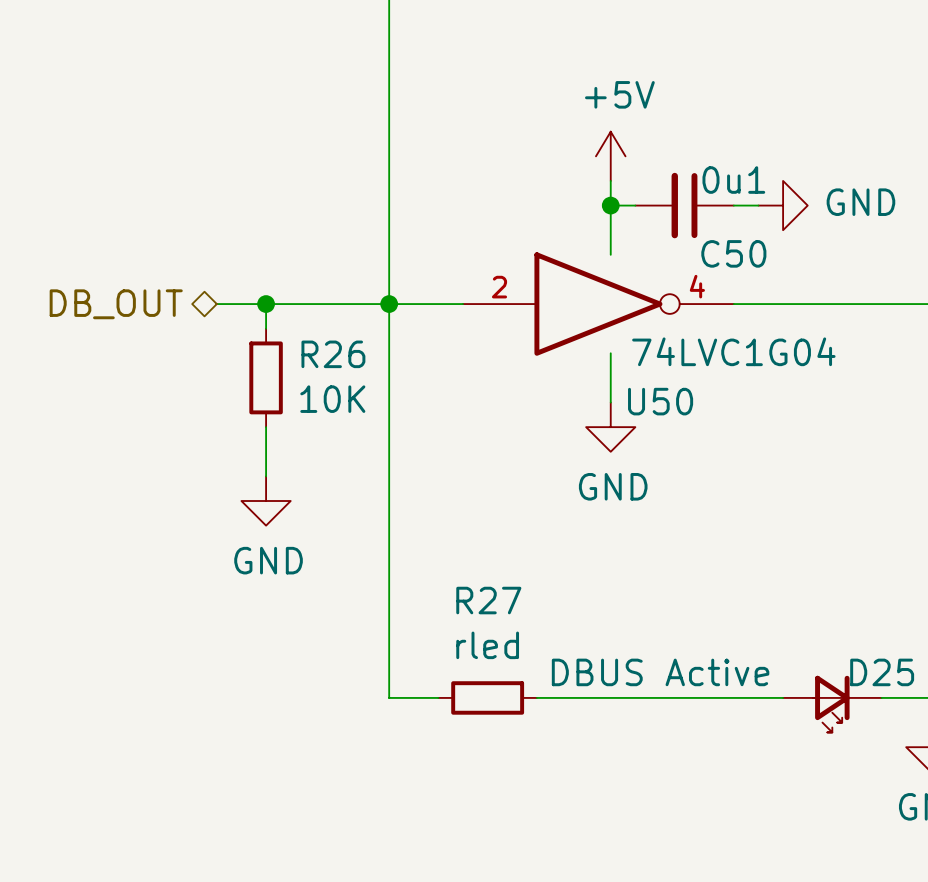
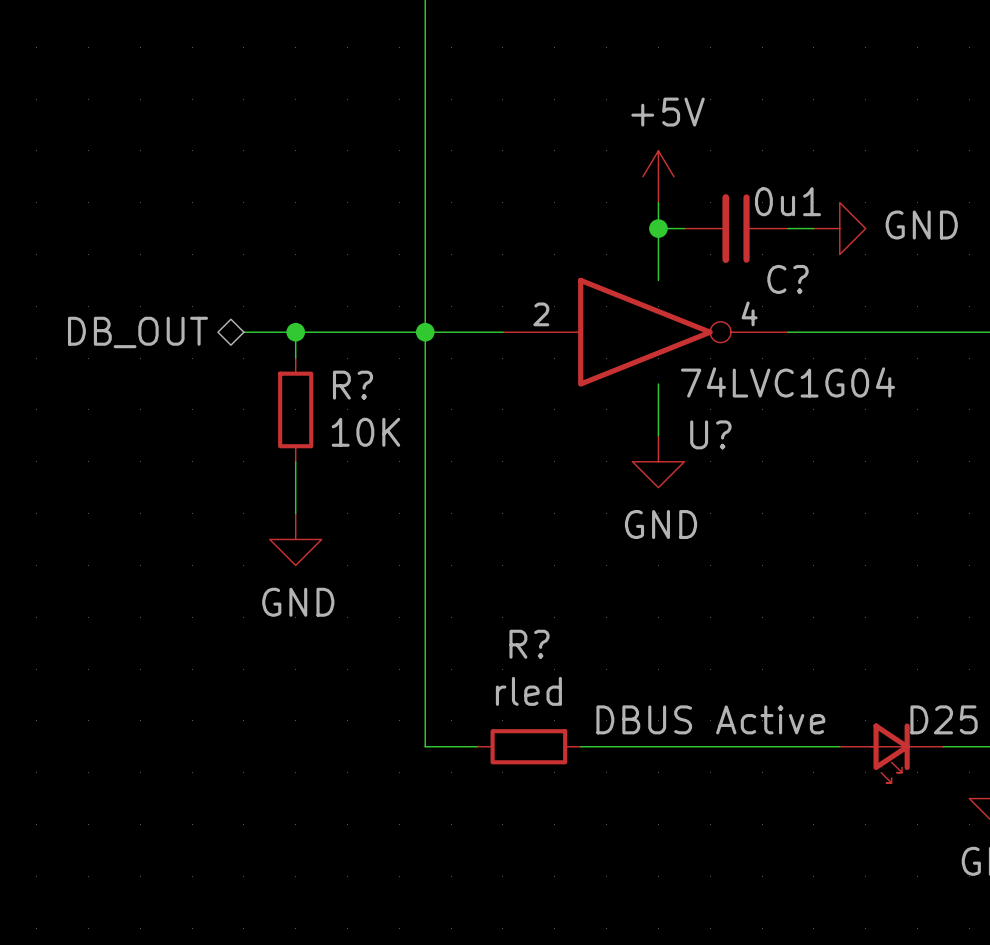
C50 name: C50 (733, 253) -> C? (787, 279)
R26 name: R26 (333, 354) -> R? (353, 385)
U50 name: U50 (660, 401) -> U? (710, 434)
R27 name: R27 (488, 600) -> R? (529, 644)

